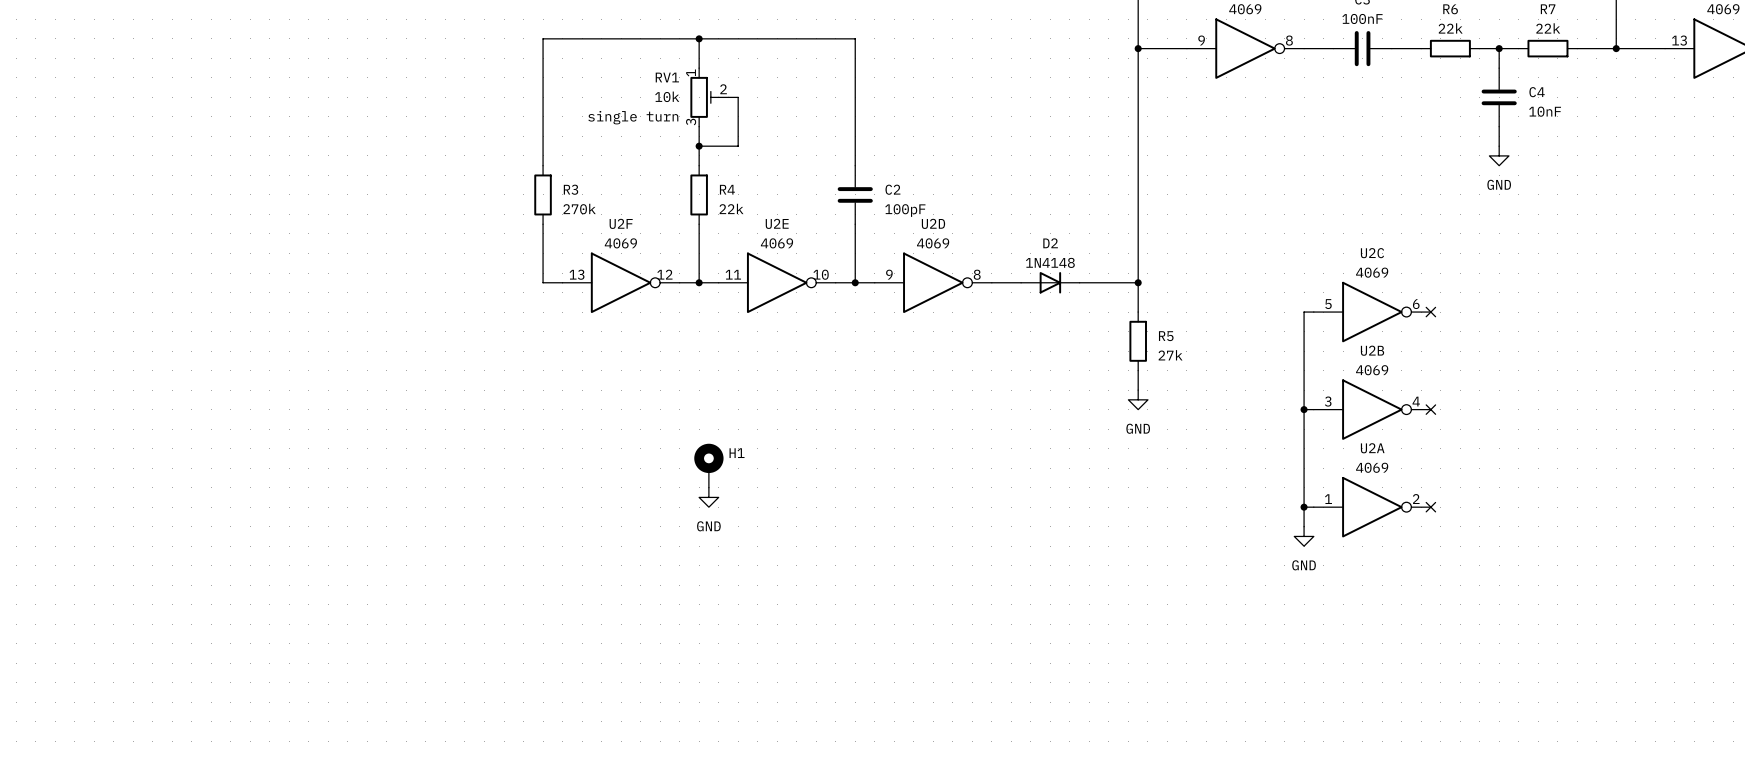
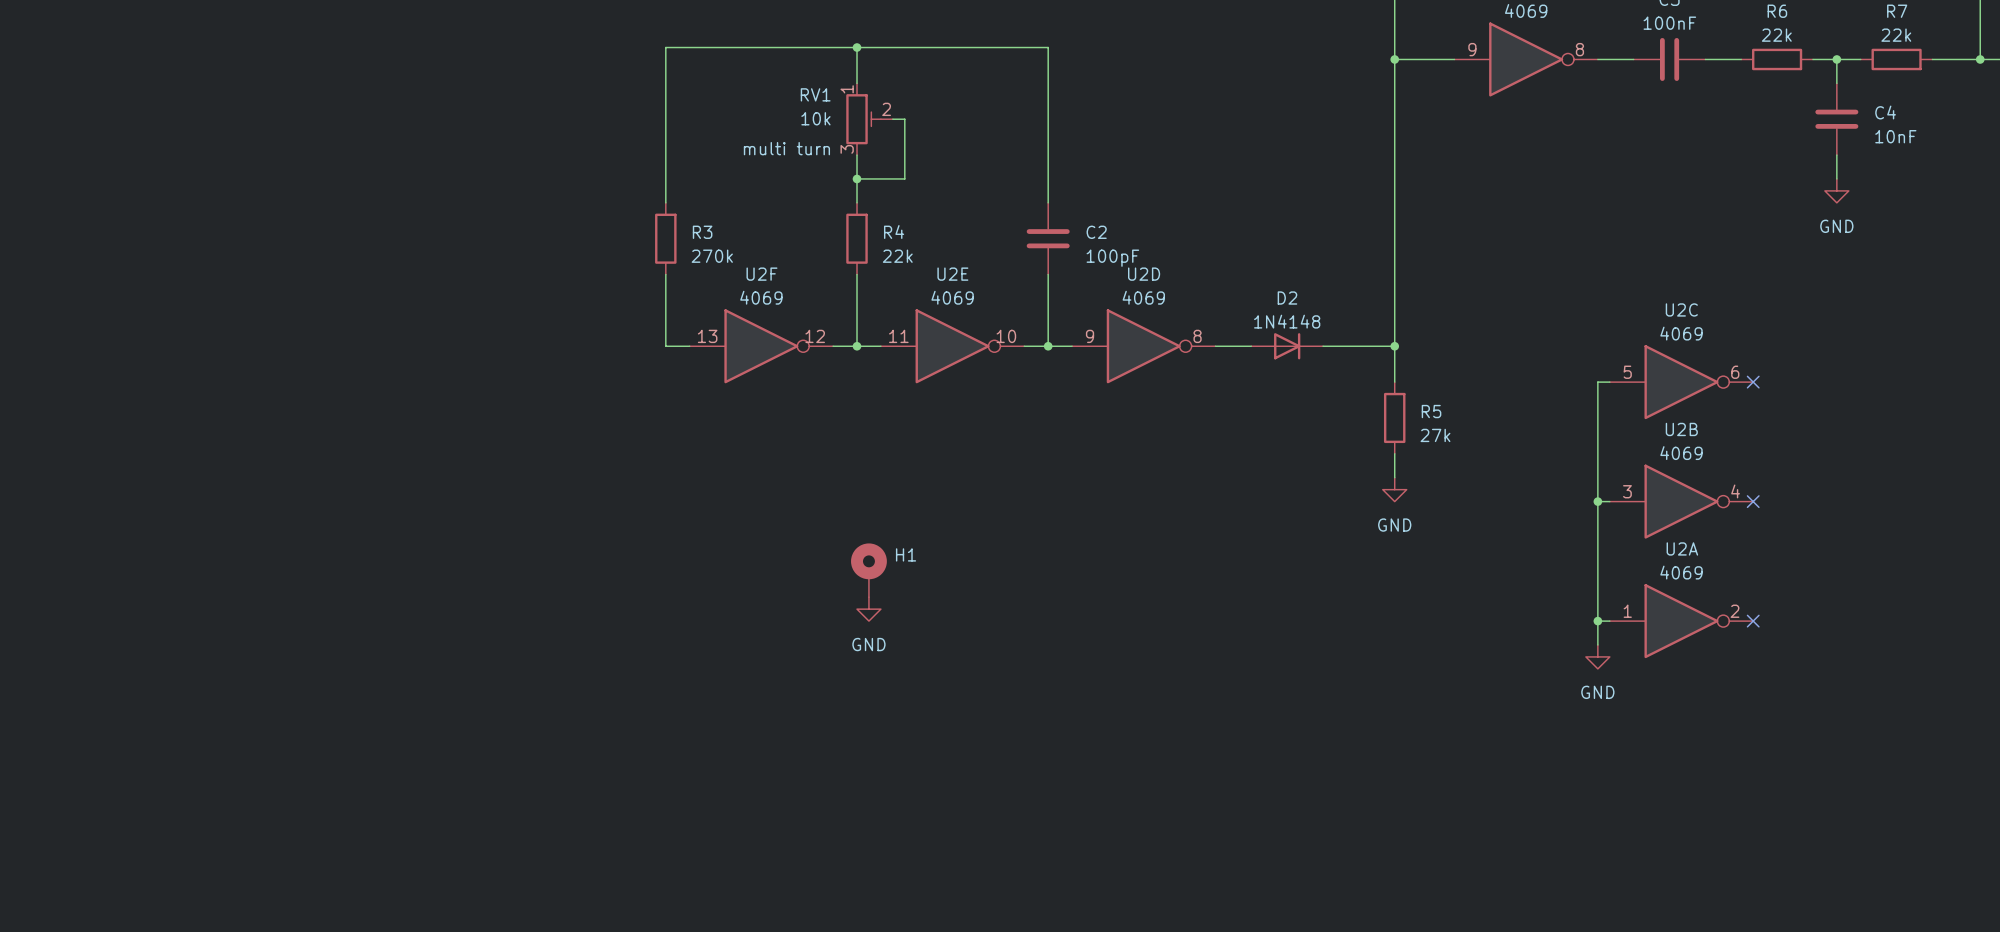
RV1 text: single turn (633, 117) -> multi turn (786, 148)

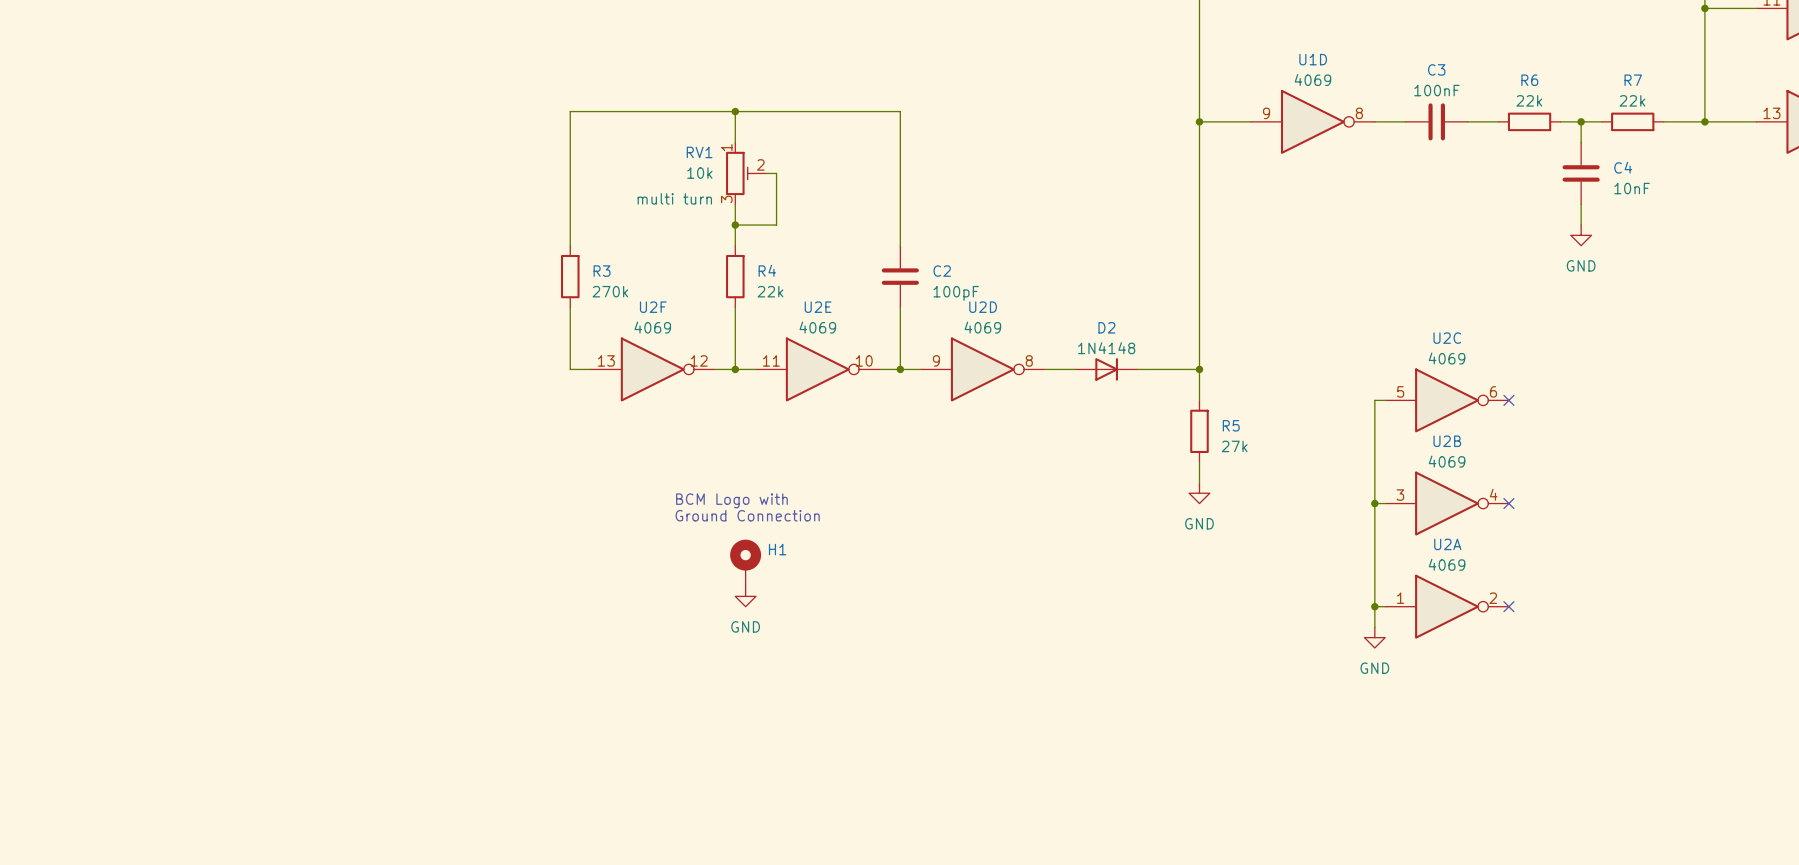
text: none -> BCM Logo with (731, 500)
text: none -> Ground Connection (747, 515)

